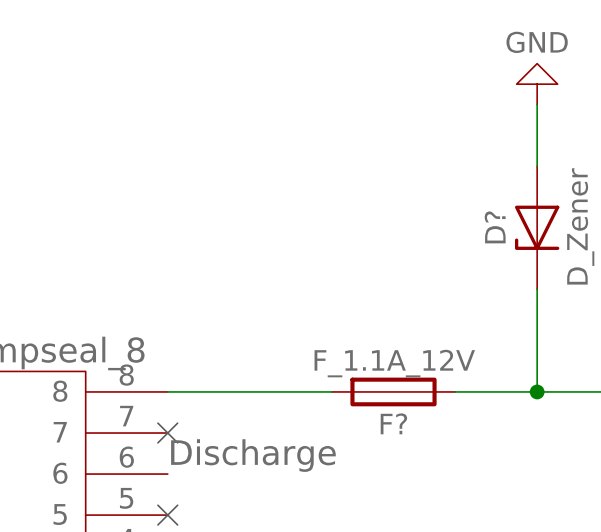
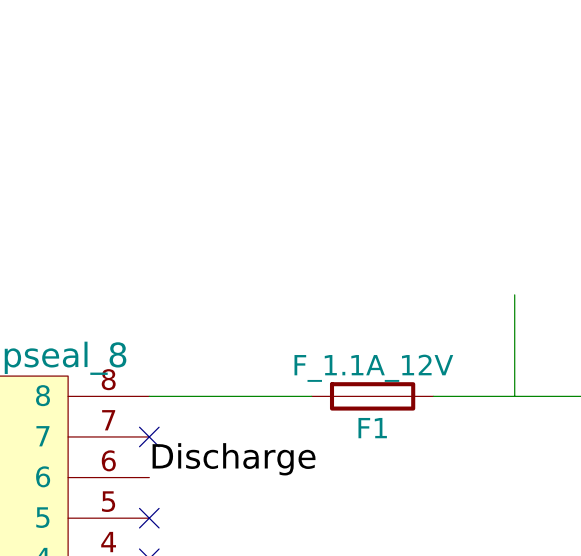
power symbol: GND (537, 84) -> none
wire: (537, 104) (537, 166) -> none
D?: D_Zener (537, 227) -> none
junction: (537, 391) -> none
F? name: F? (393, 423) -> F1 (372, 428)

